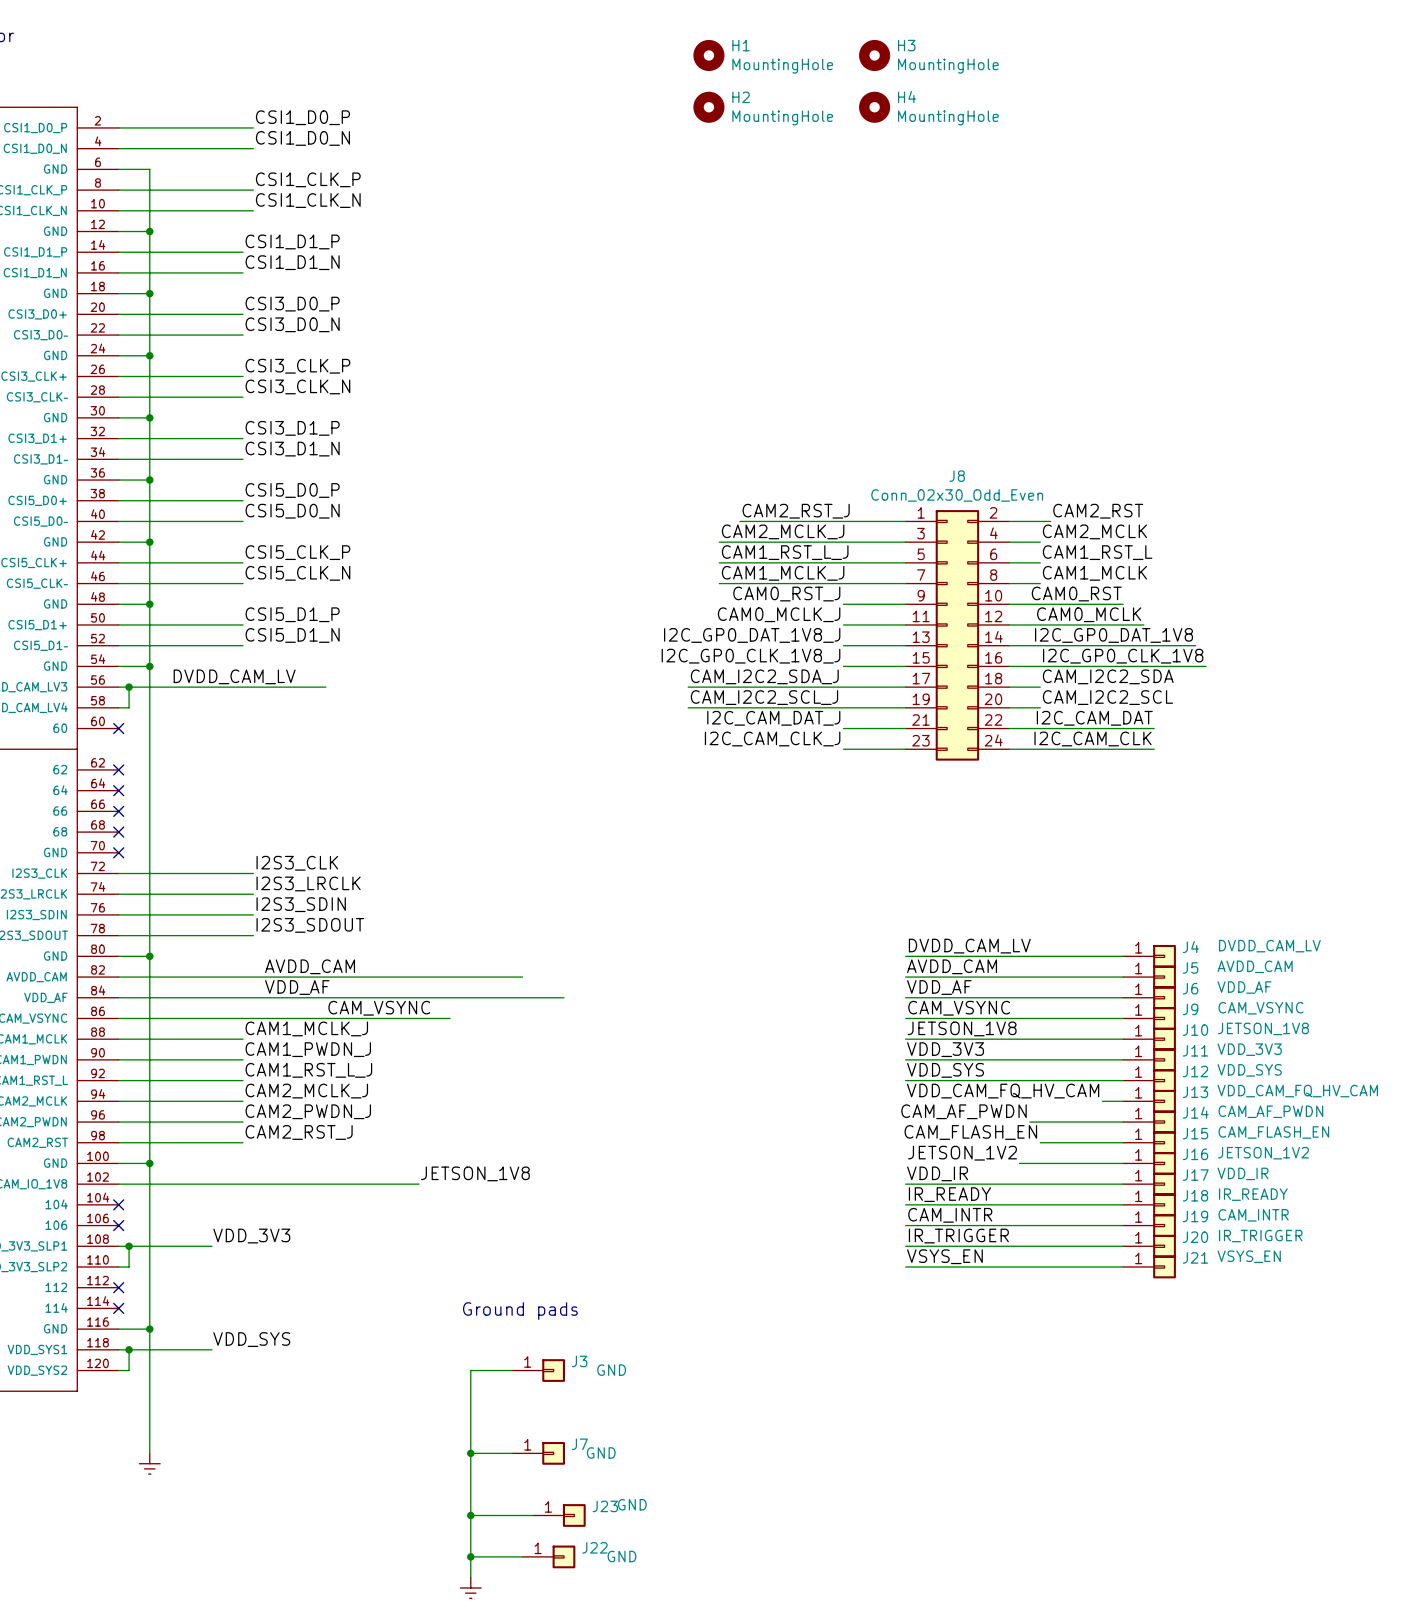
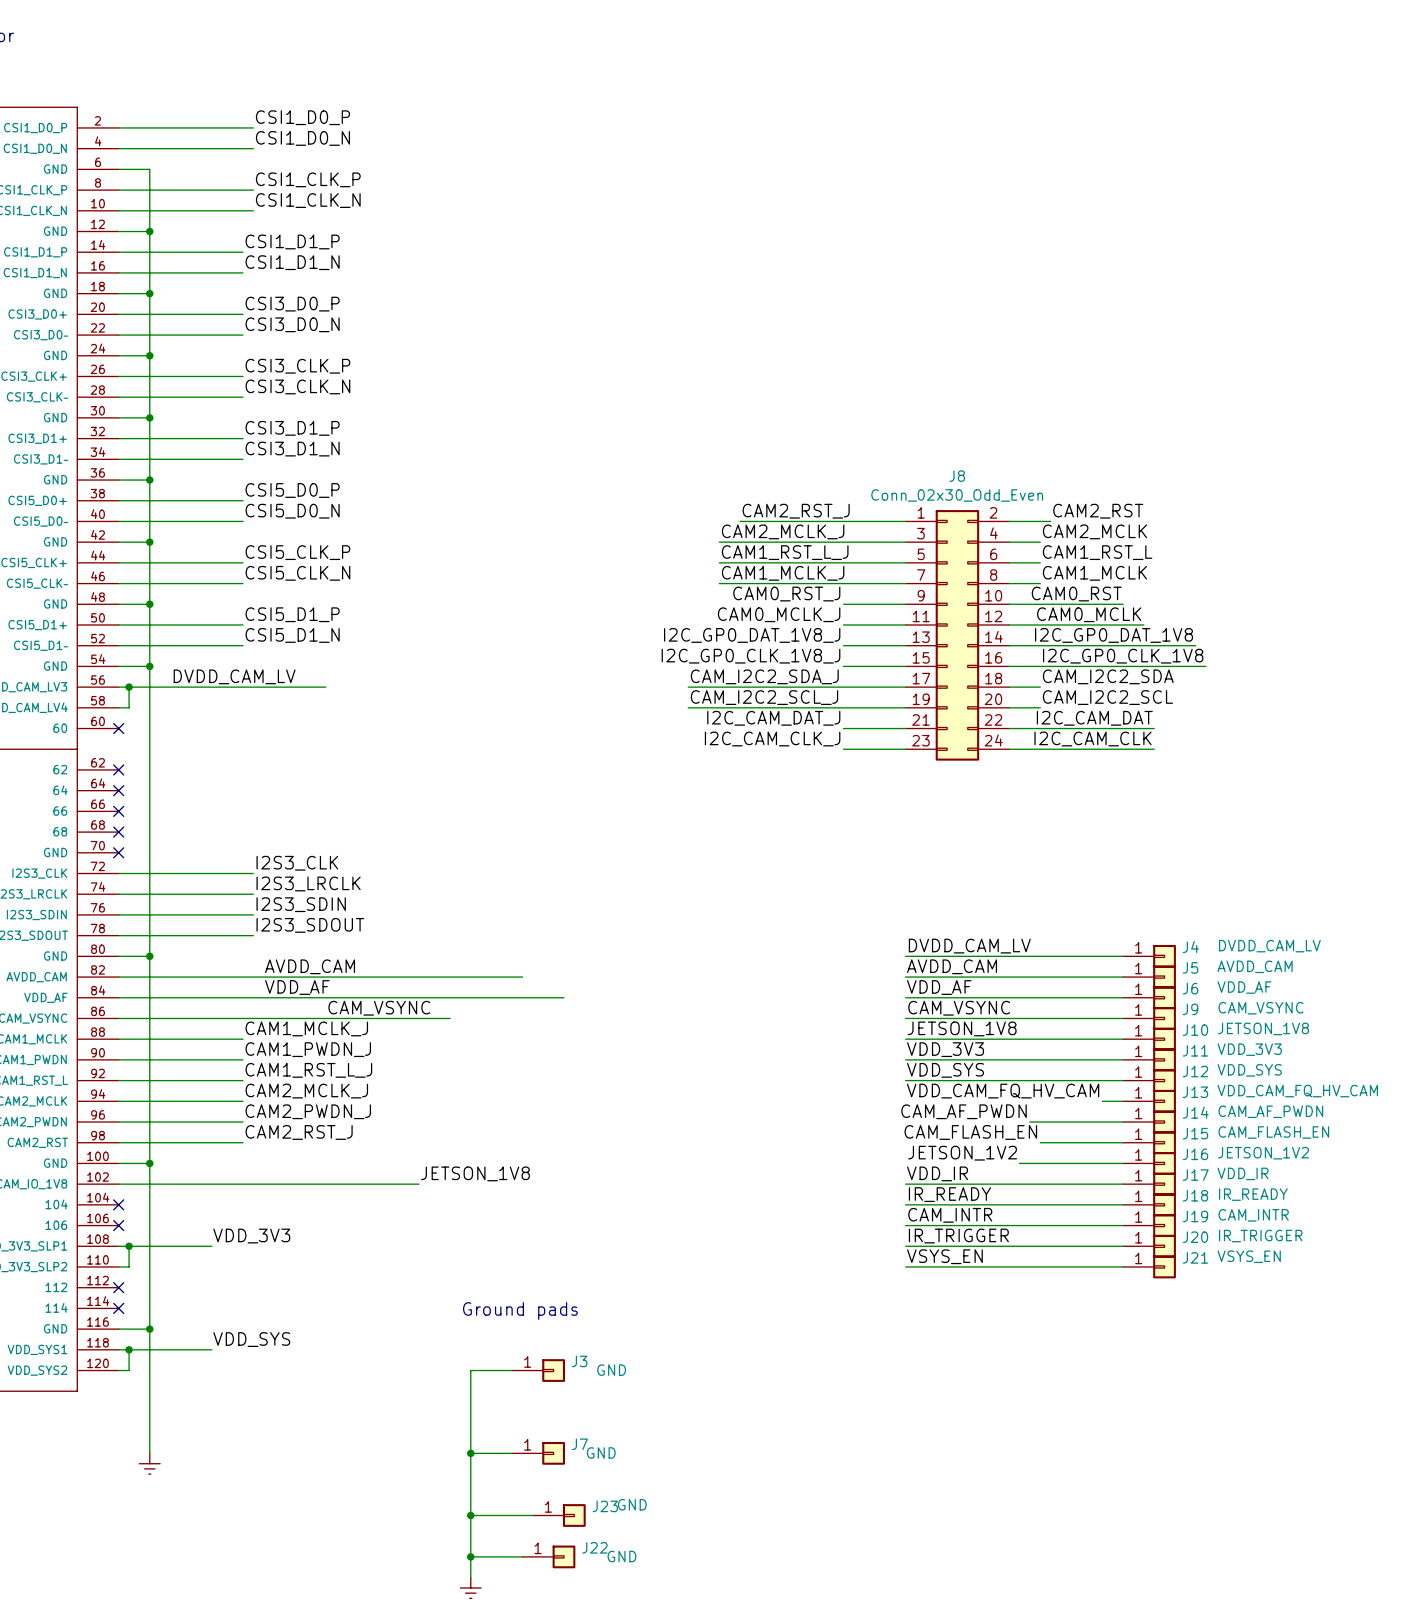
H1: MountingHole (708, 55) -> none
H3: MountingHole (874, 55) -> none
H2: MountingHole (708, 107) -> none
H4: MountingHole (874, 107) -> none

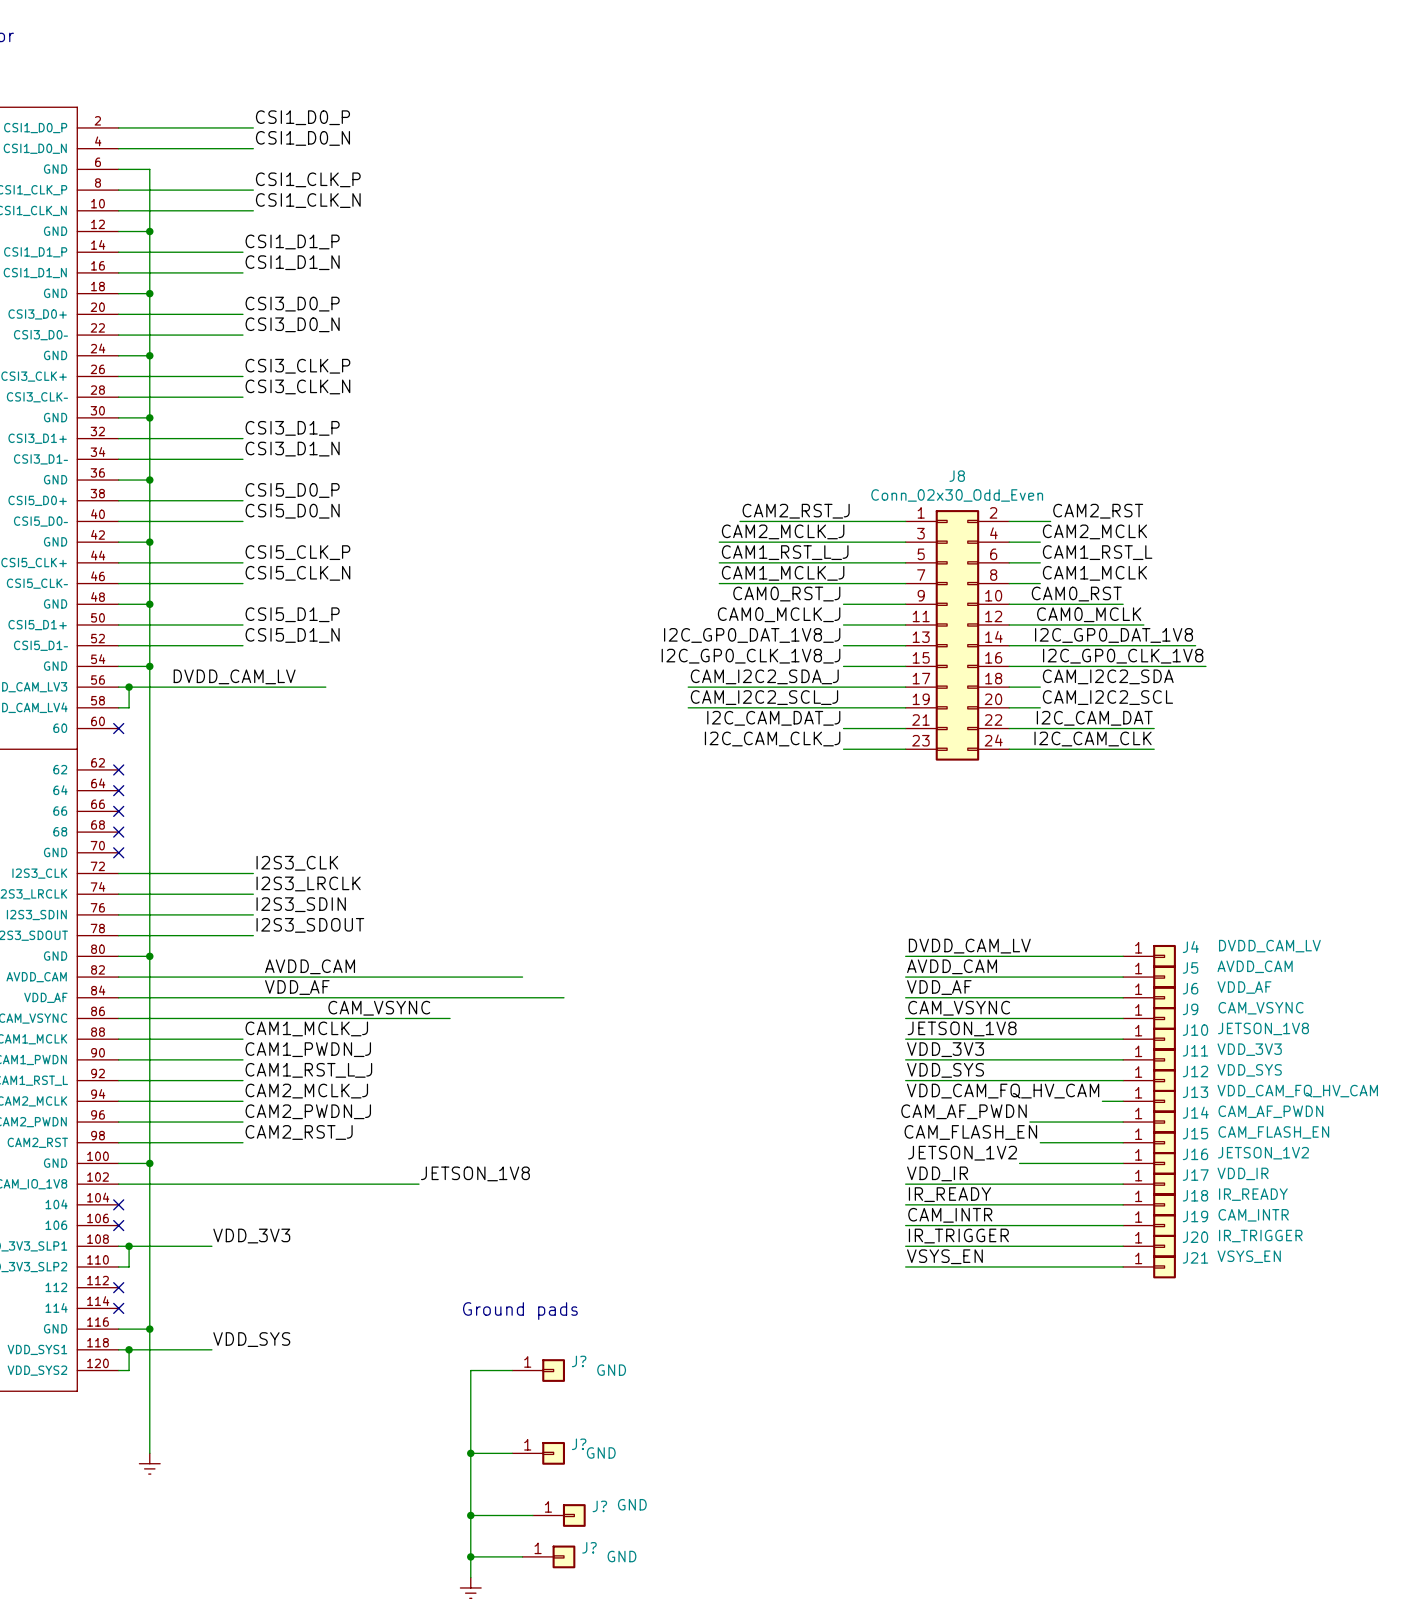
J3 name: J3 (579, 1361) -> J? (579, 1361)
J7 name: J7 (579, 1444) -> J? (579, 1444)
J23 name: J23 (605, 1506) -> J? (599, 1506)
J22 name: J22 (594, 1547) -> J? (589, 1547)

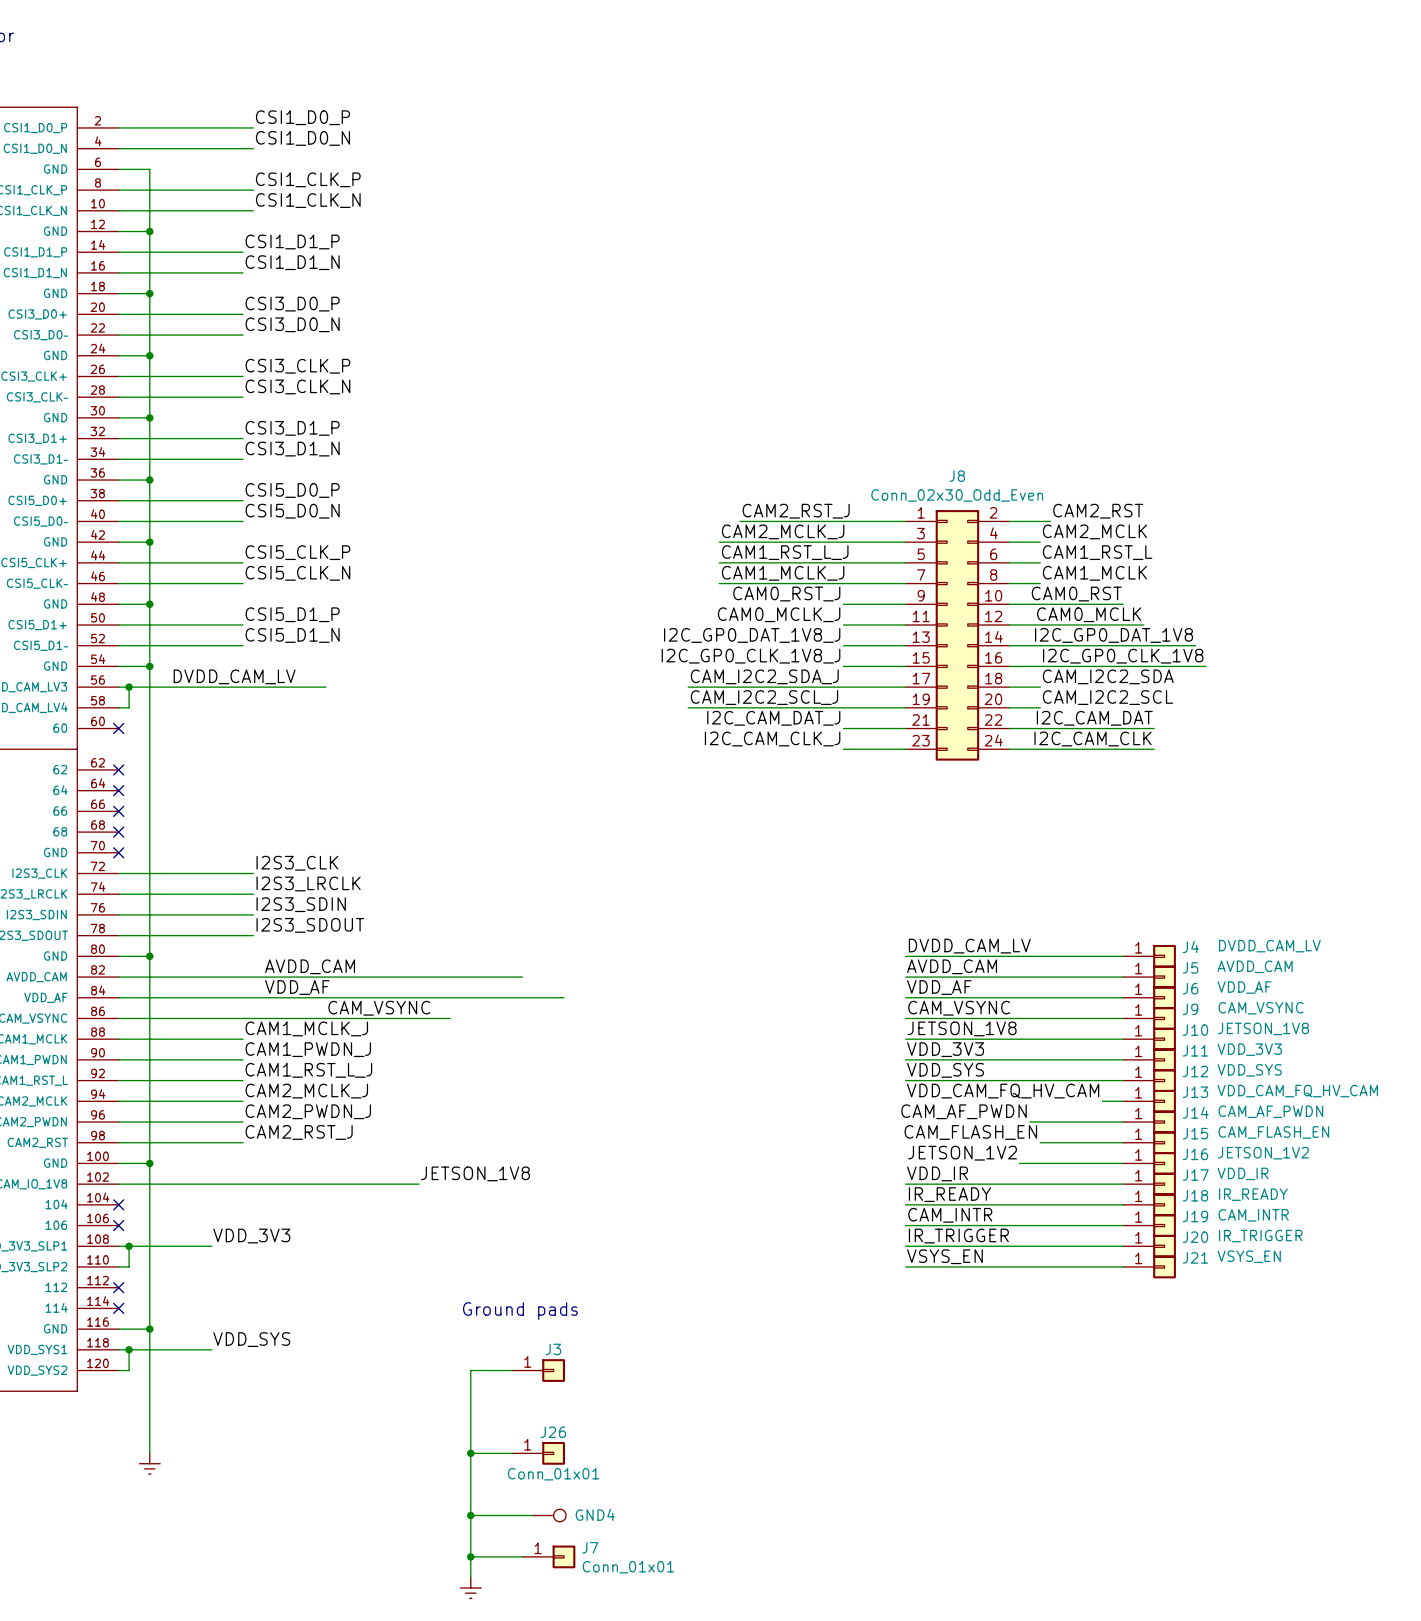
J? name: J? (579, 1361) -> J3 (553, 1349)
J? value: GND (611, 1370) -> none
J? name: J? (579, 1444) -> J26 (553, 1432)
J? value: GND (601, 1452) -> Conn_01x01 (553, 1474)
GND4: none -> (549, 1515)
J?: GND (559, 1515) -> none
J? name: J? (589, 1547) -> J7 (590, 1547)
J? value: GND (621, 1556) -> Conn_01x01 (628, 1567)

